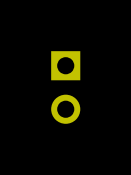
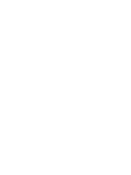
part: (65, 87) -> none

